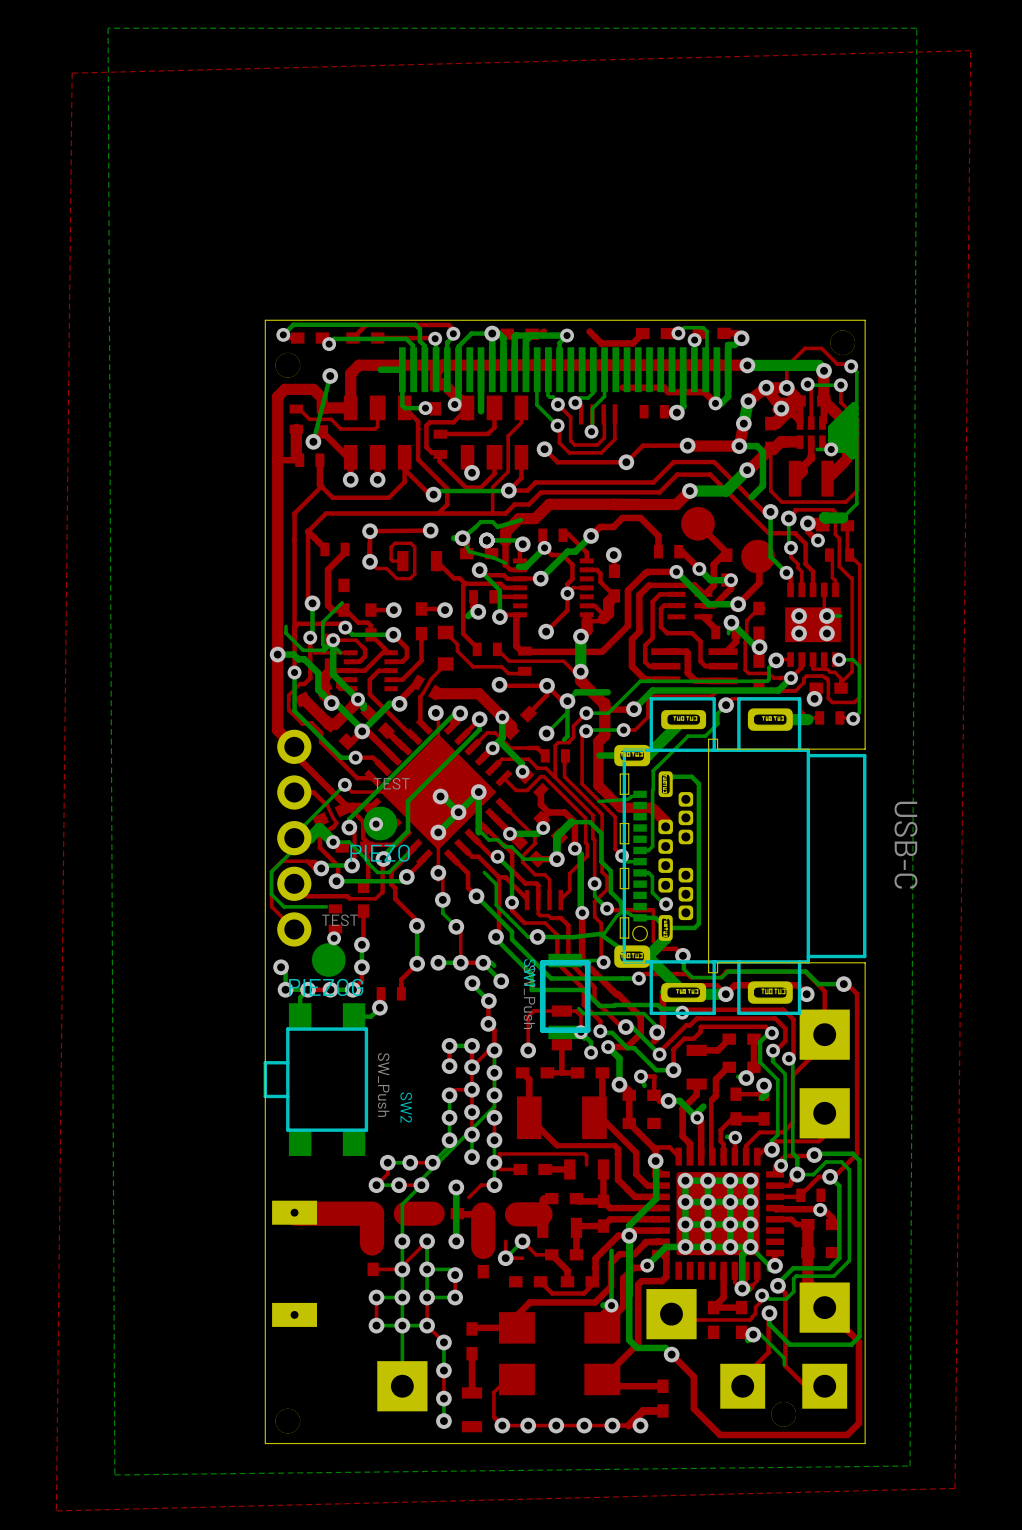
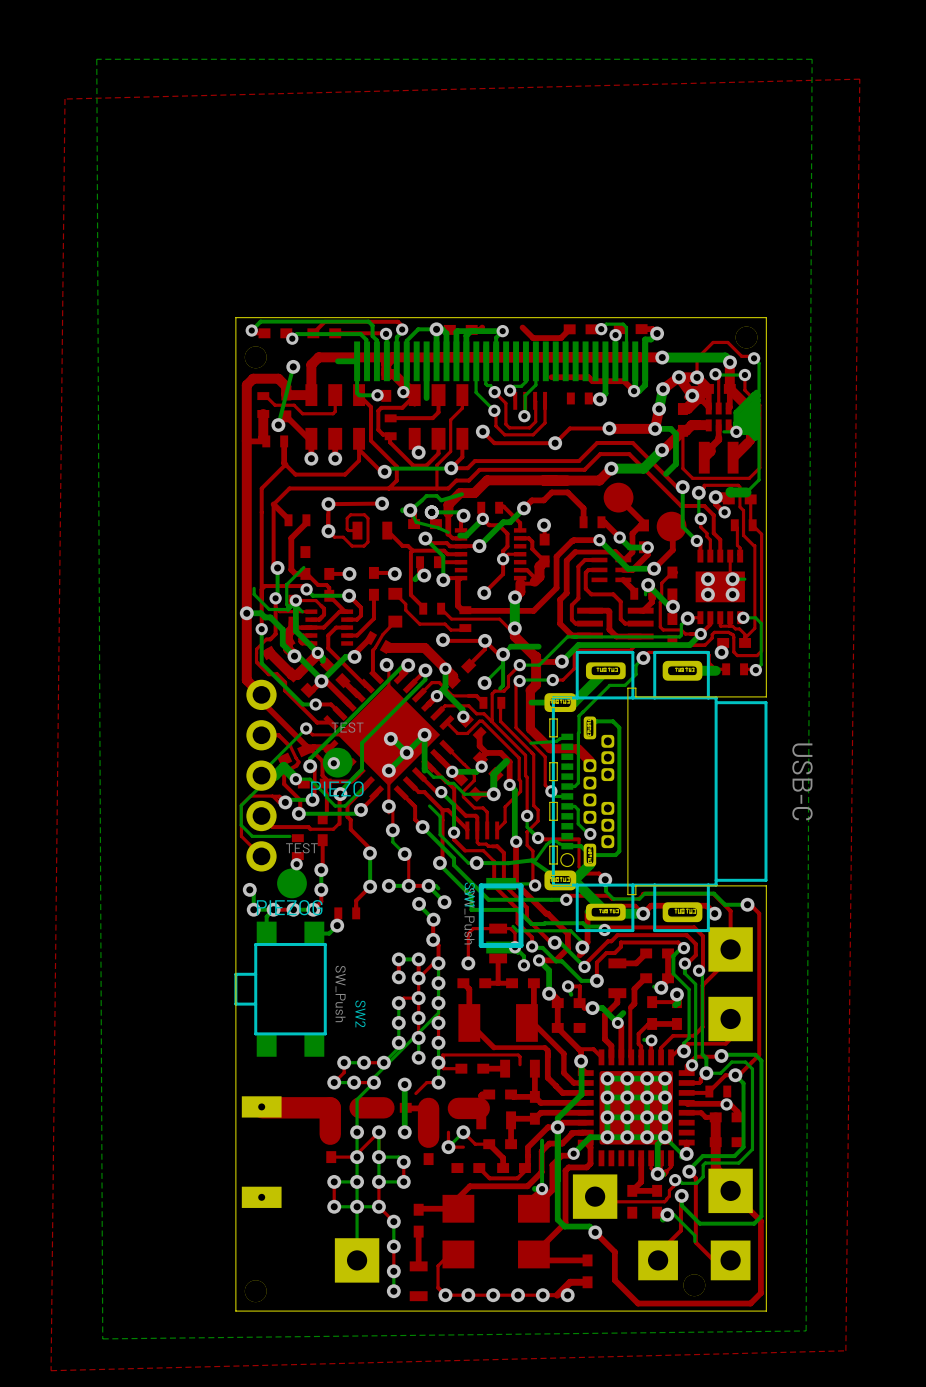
bottom track: (571, 822) (589, 822) (601, 833) (601, 861) (610, 871) (610, 892) (620, 901) (622, 910) -> none

